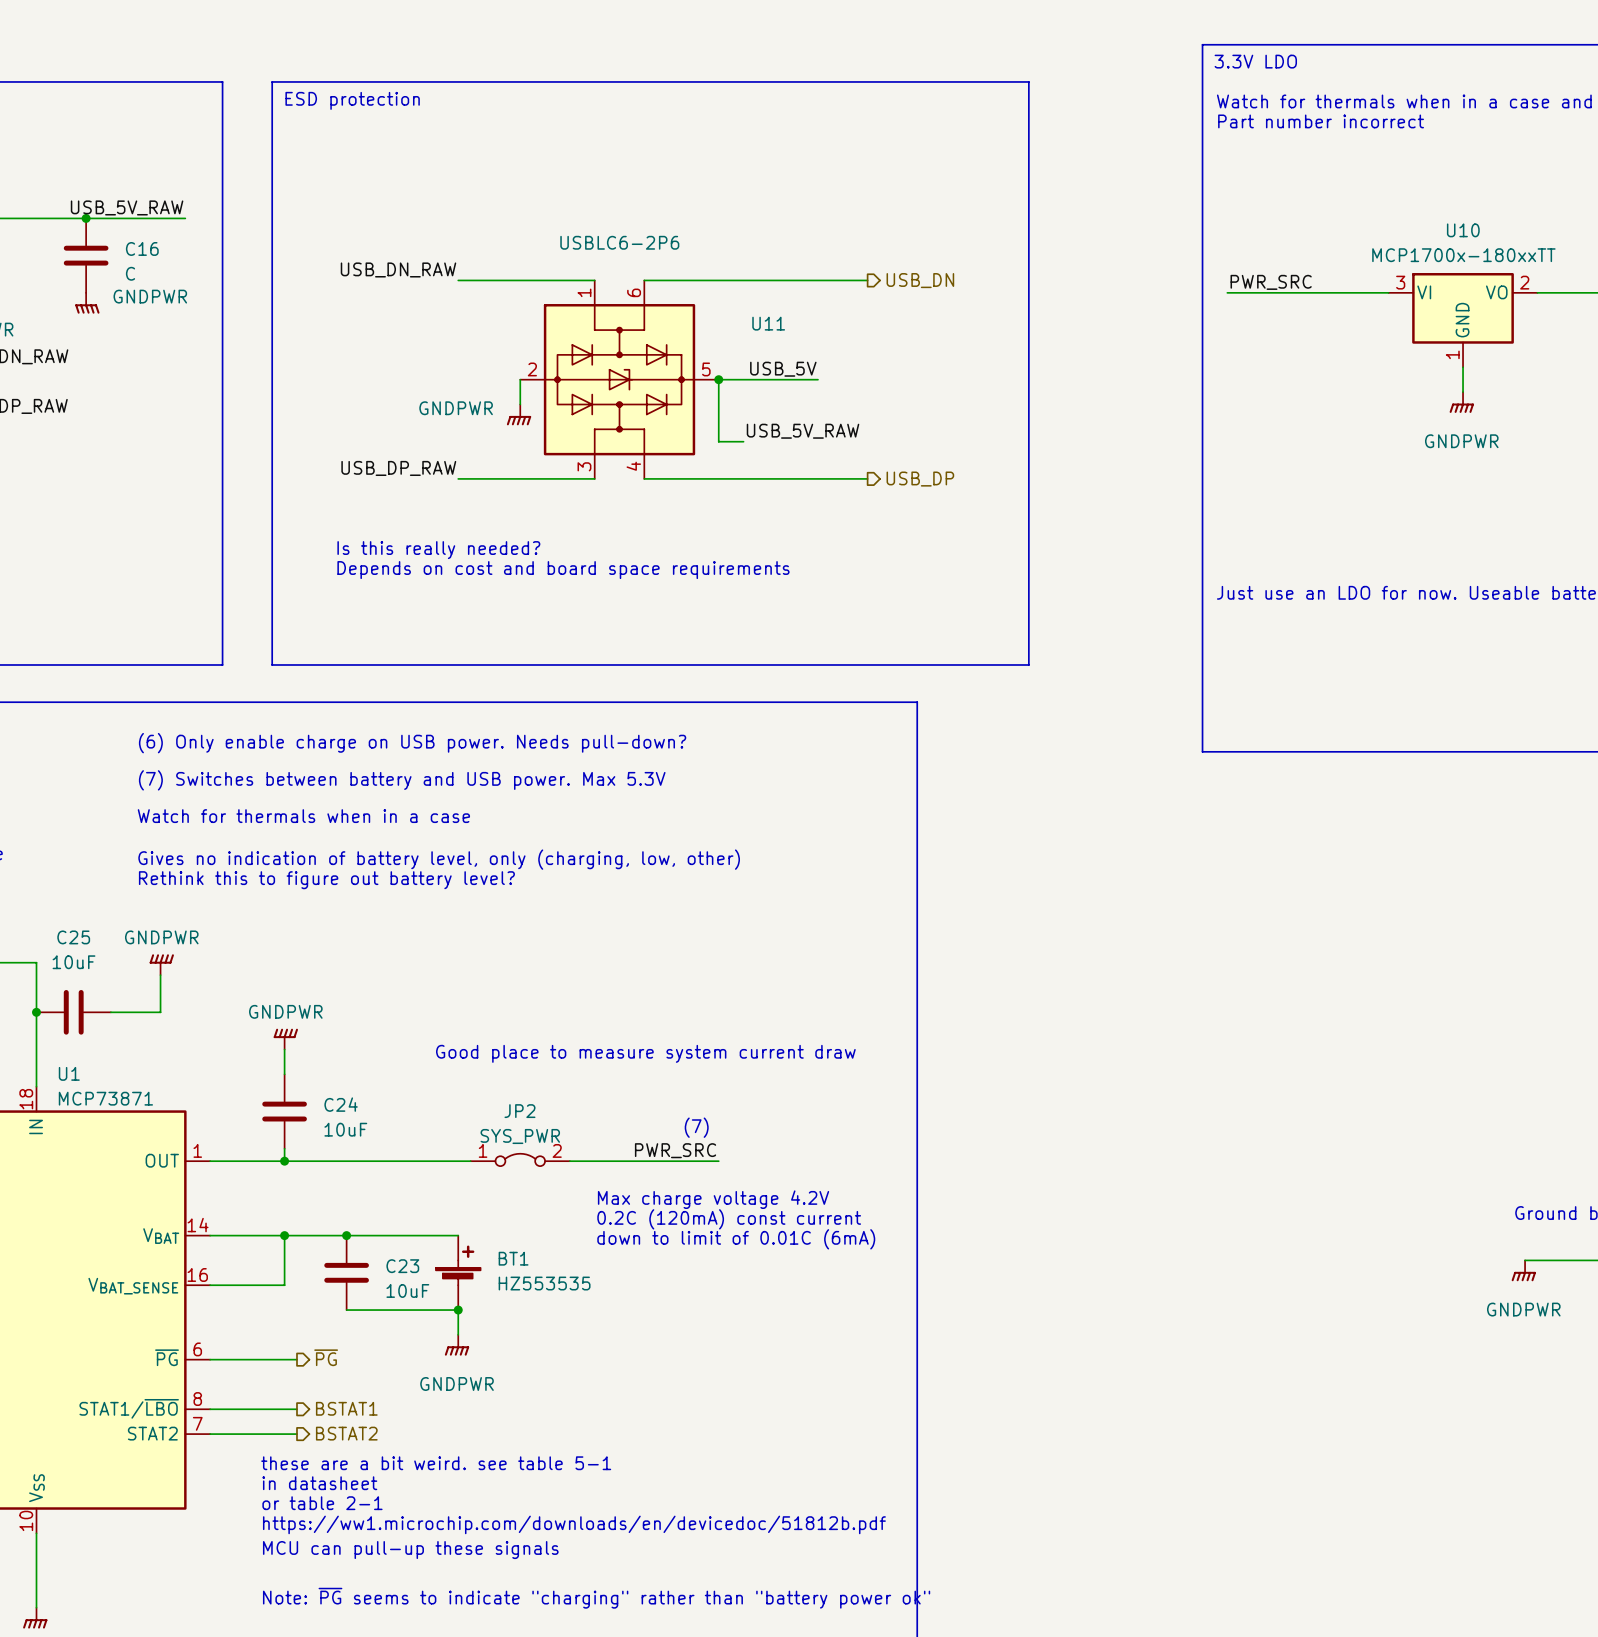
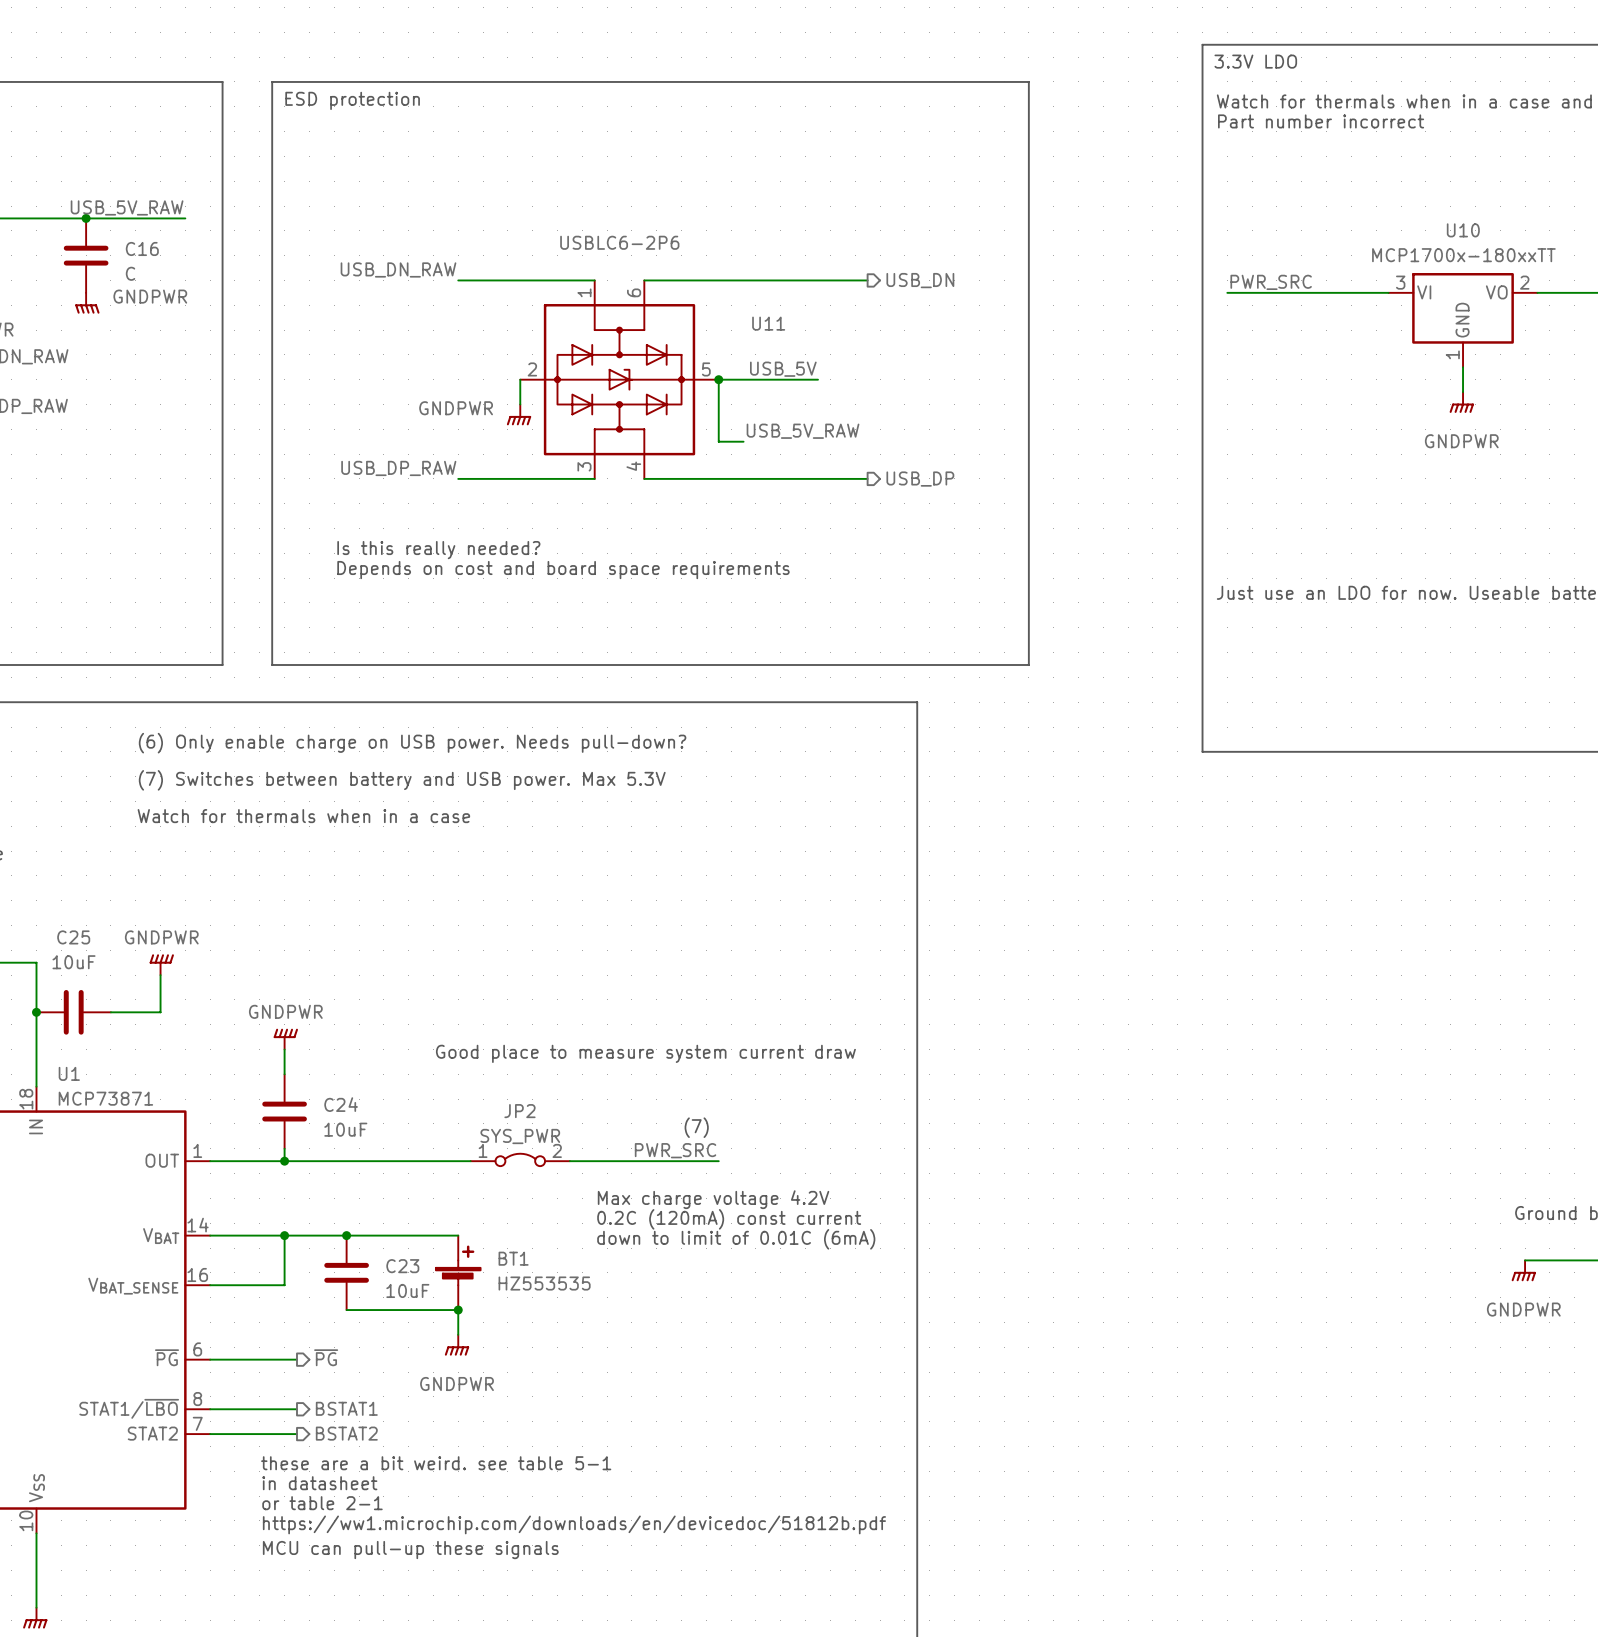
text: Gives no indication of battery level, only (charging, low, other) (439, 859) -> none
text: Rethink this to figure out battery level? (326, 880) -> none
text: Note: ~{PG} seems to indicate "charging" rather than "battery power ok" (596, 1598) -> none

